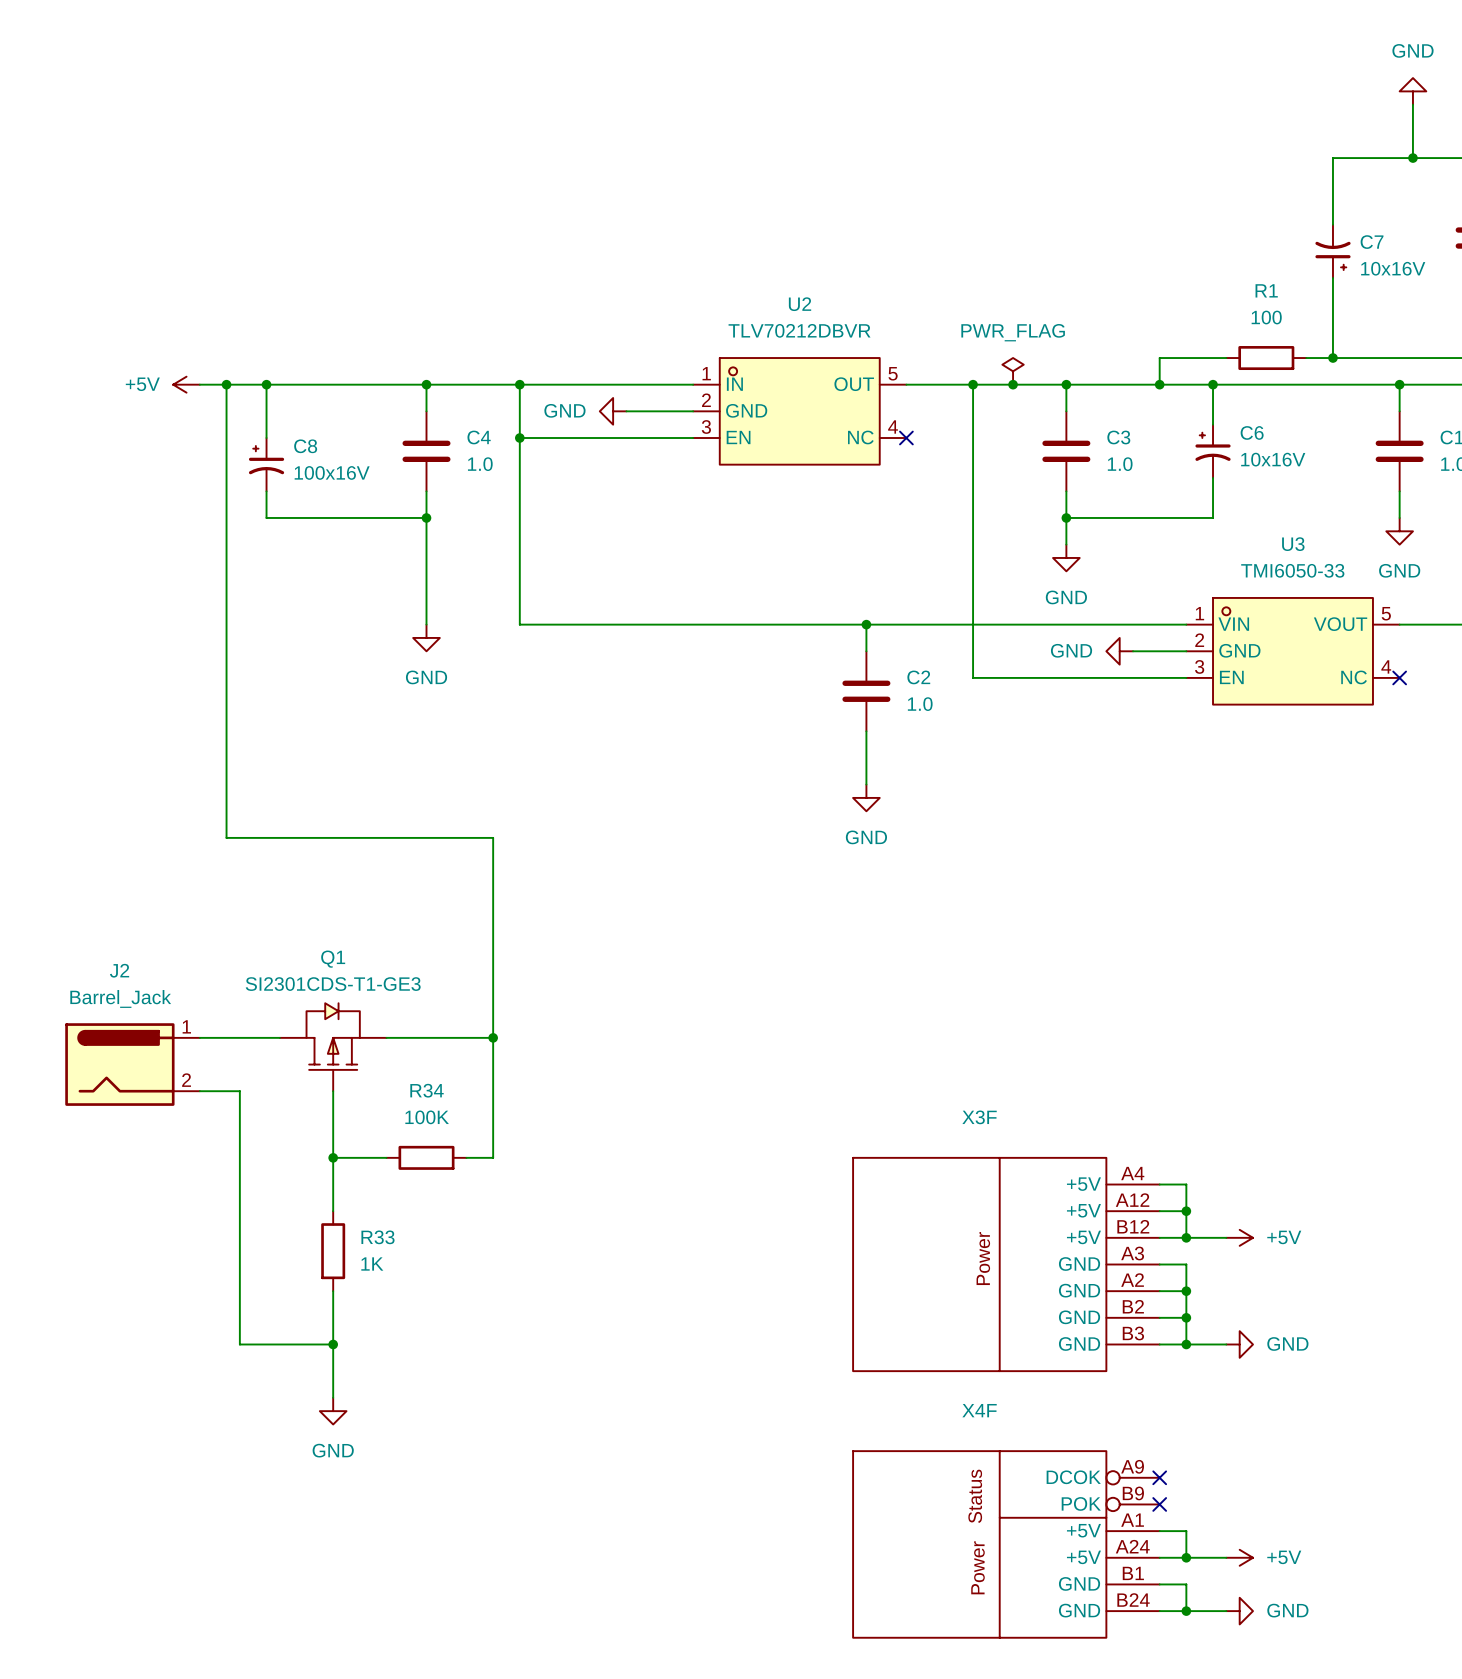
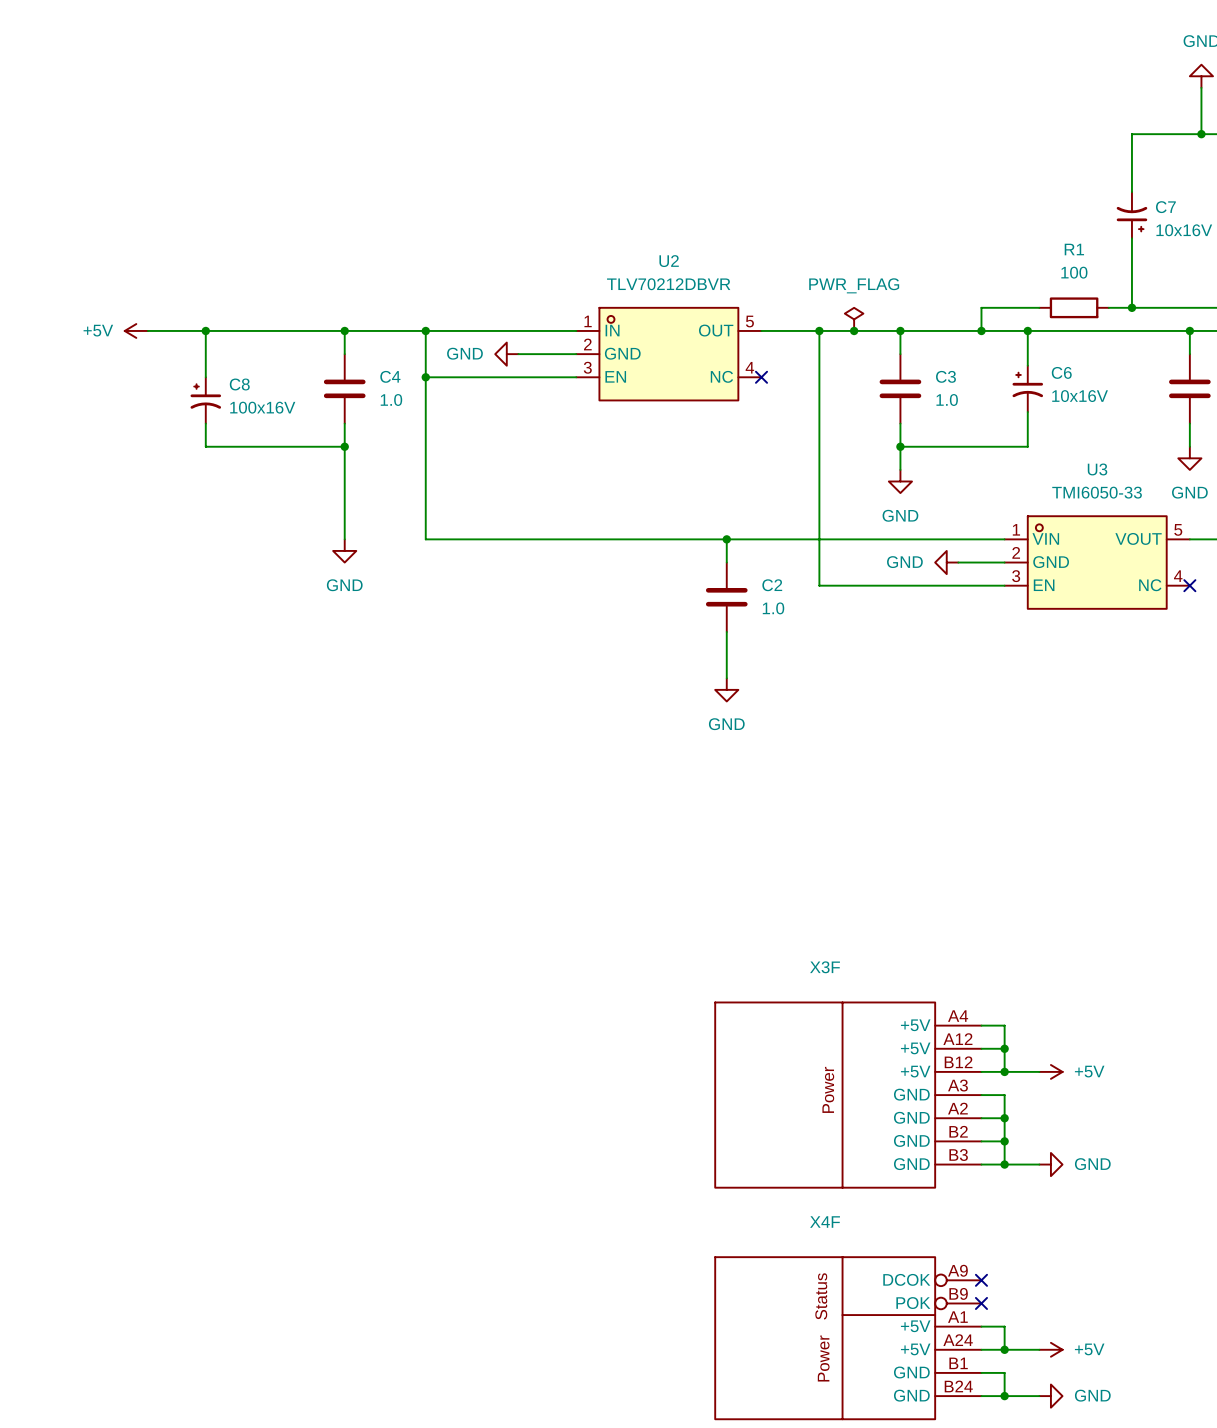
wire: (226, 384) (226, 837) (493, 837) (493, 1157) (466, 1157) -> none
junction: (226, 384) -> none
wire: (199, 1037) (279, 1037) -> none
wire: (386, 1037) (493, 1037) -> none
junction: (493, 1037) -> none
Q1: SI2301CDS-T1-GE3 (333, 1047) -> none
J2: Barrel_Jack (132, 1064) -> none
wire: (199, 1091) (239, 1091) (239, 1344) (333, 1344) -> none
wire: (333, 1091) (333, 1211) -> none
wire: (333, 1157) (386, 1157) -> none
junction: (333, 1157) -> none
R34: 100K (426, 1157) -> none
R33: 1K (333, 1251) -> none
wire: (333, 1291) (333, 1397) -> none
junction: (333, 1344) -> none
power symbol: GND (333, 1411) -> none

